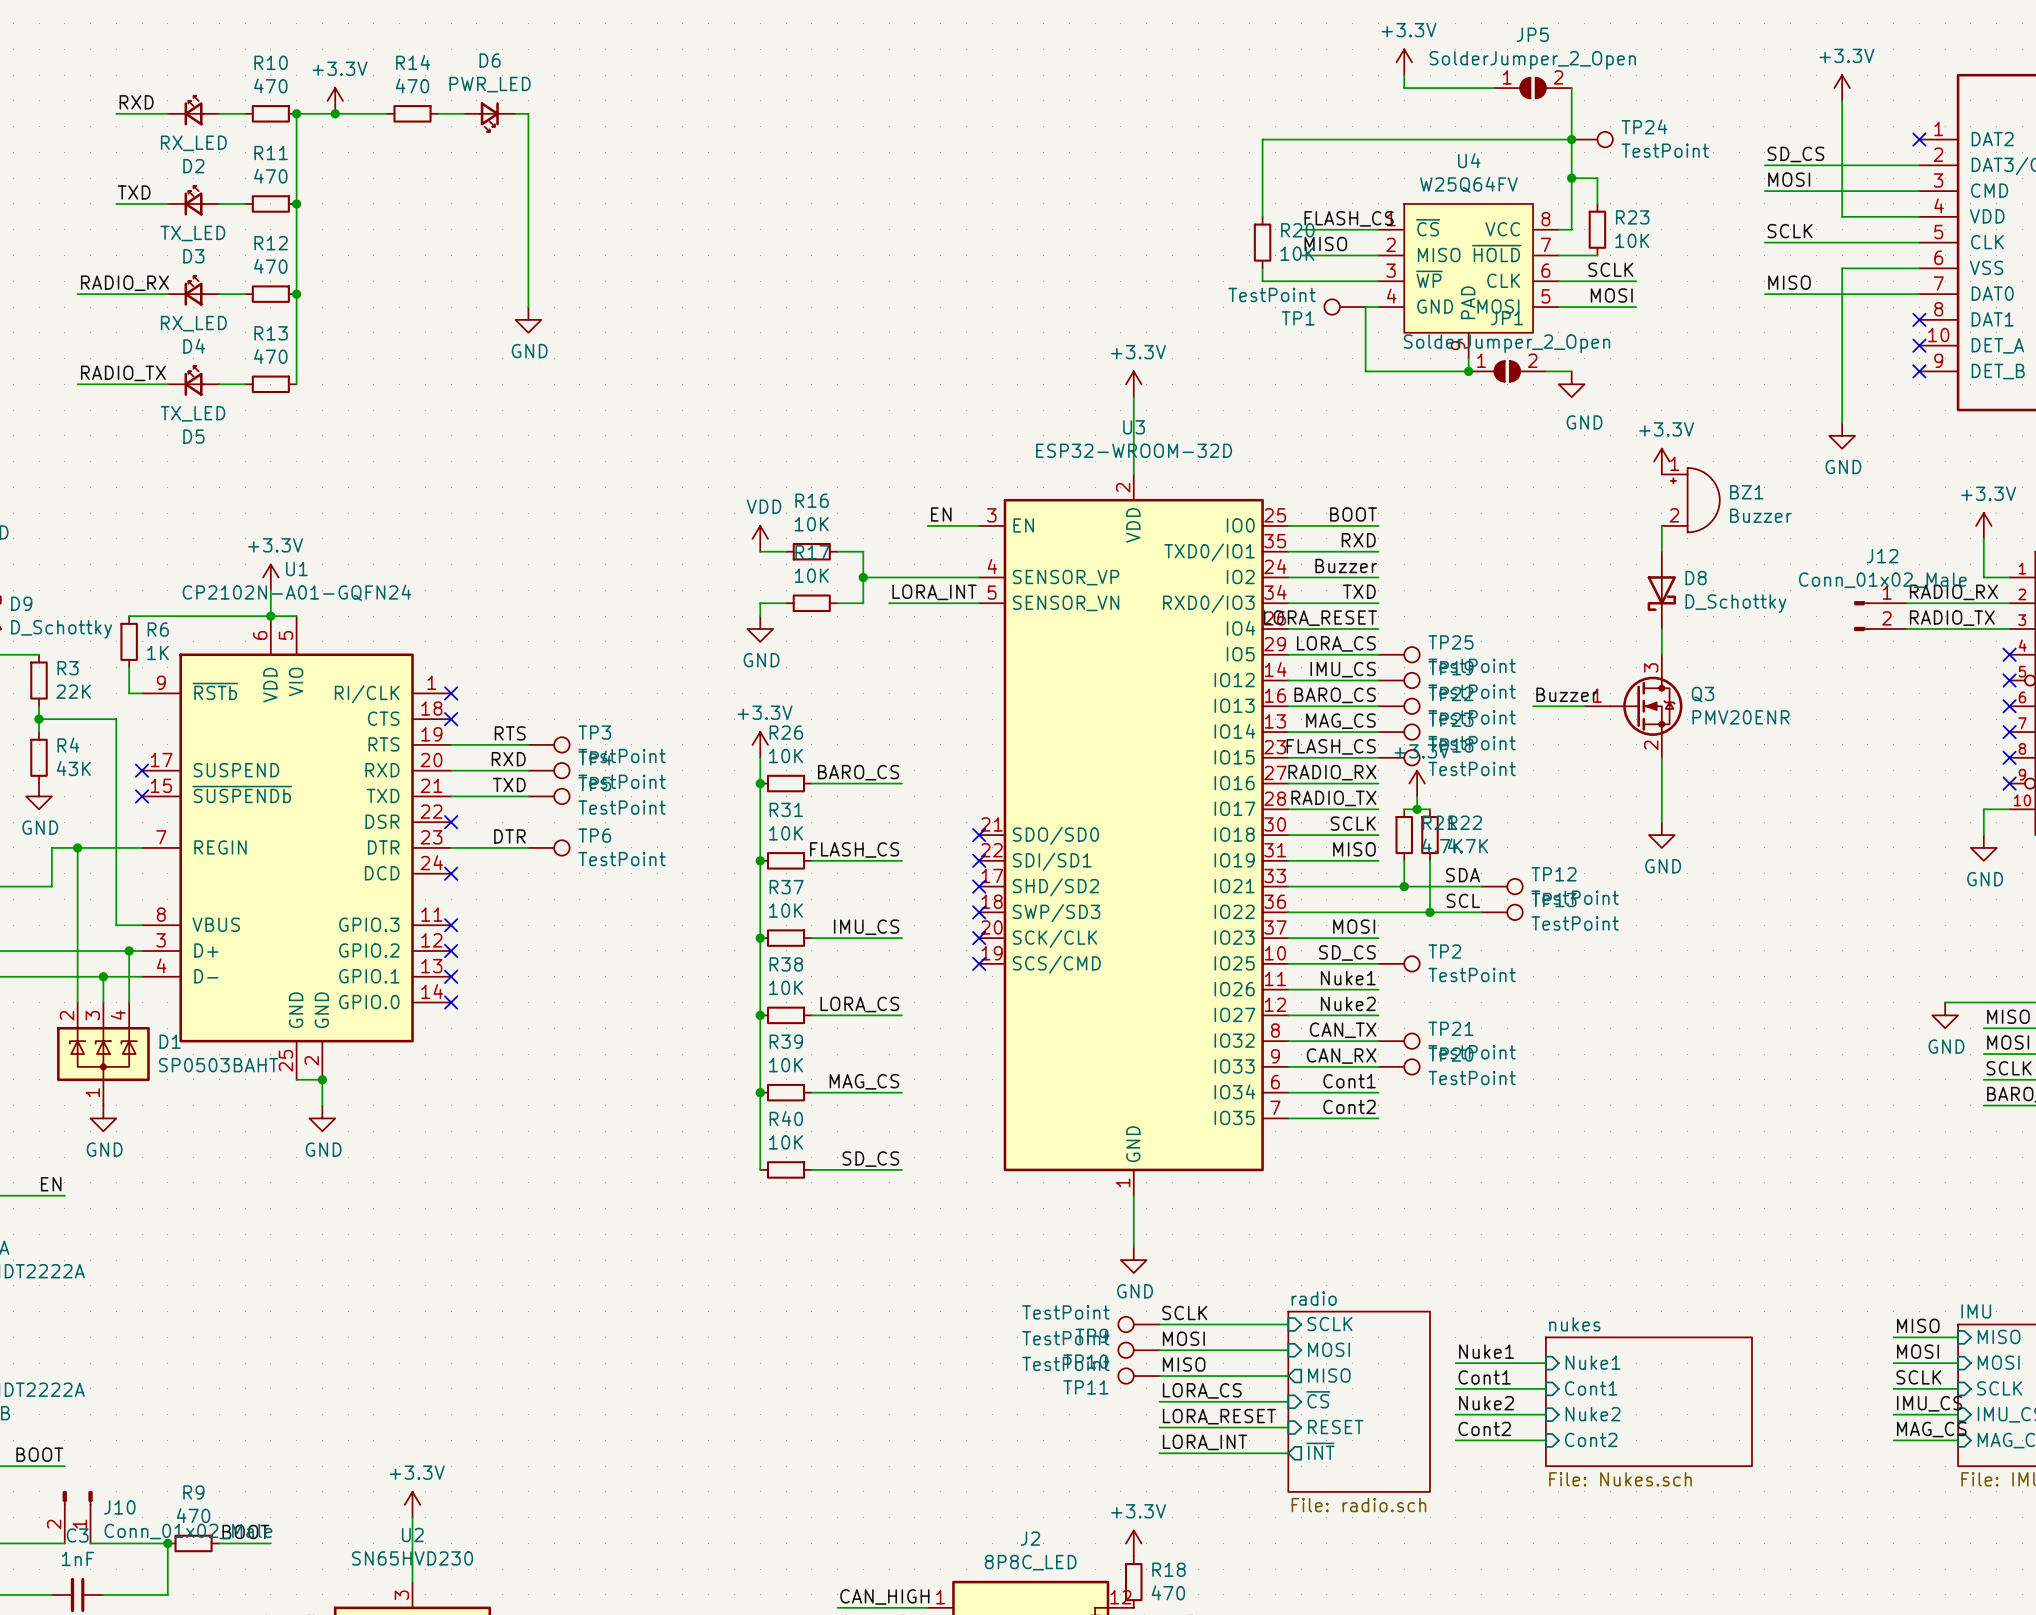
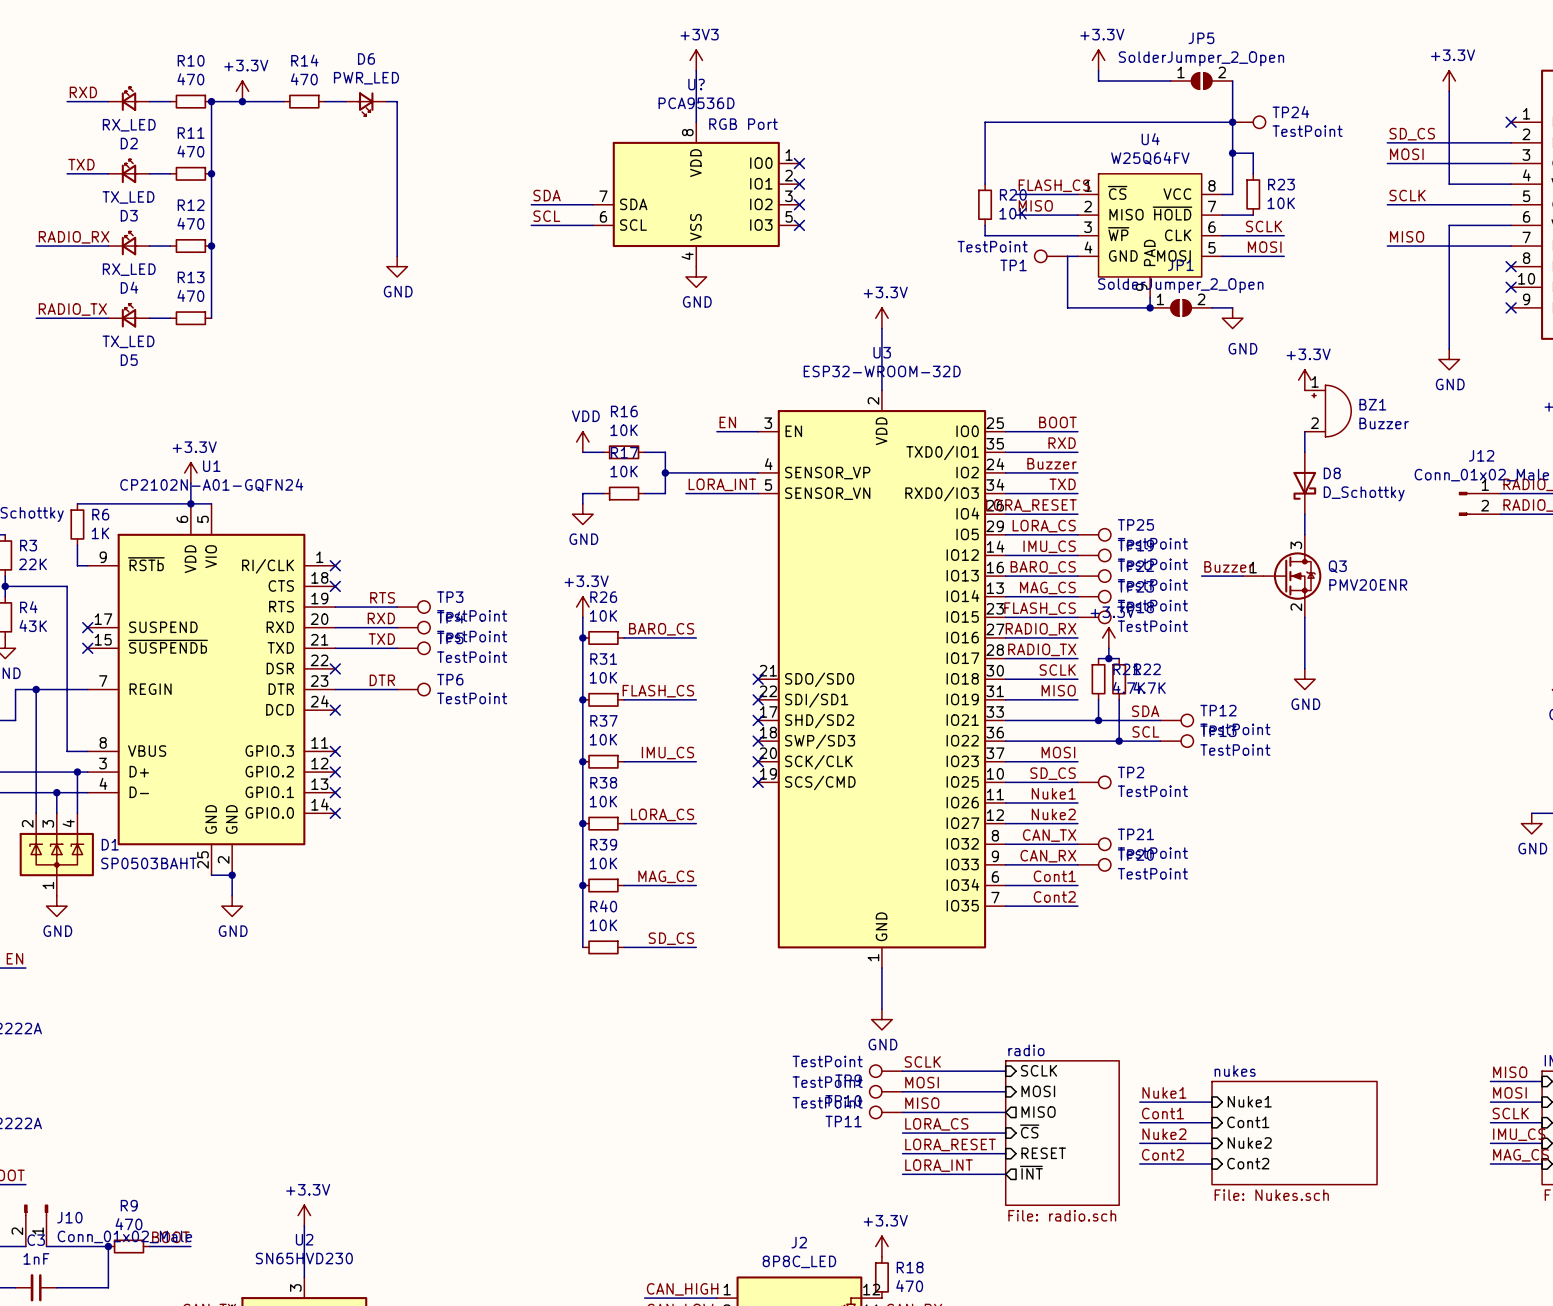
power symbol: none -> +3V3 (696, 60)
wire: none -> (696, 70) (696, 122)
text: none -> RGB Port (743, 124)
no-connect mark: none -> (799, 163)
no-connect mark: none -> (799, 184)
U?: none -> PCA9536D (696, 194)
label: none -> SDA (547, 195)
wire: none -> (531, 204) (593, 204)
no-connect mark: none -> (799, 204)
label: none -> SCL (546, 216)
wire: none -> (531, 225) (593, 225)
no-connect mark: none -> (799, 225)
power symbol: none -> GND (696, 276)

